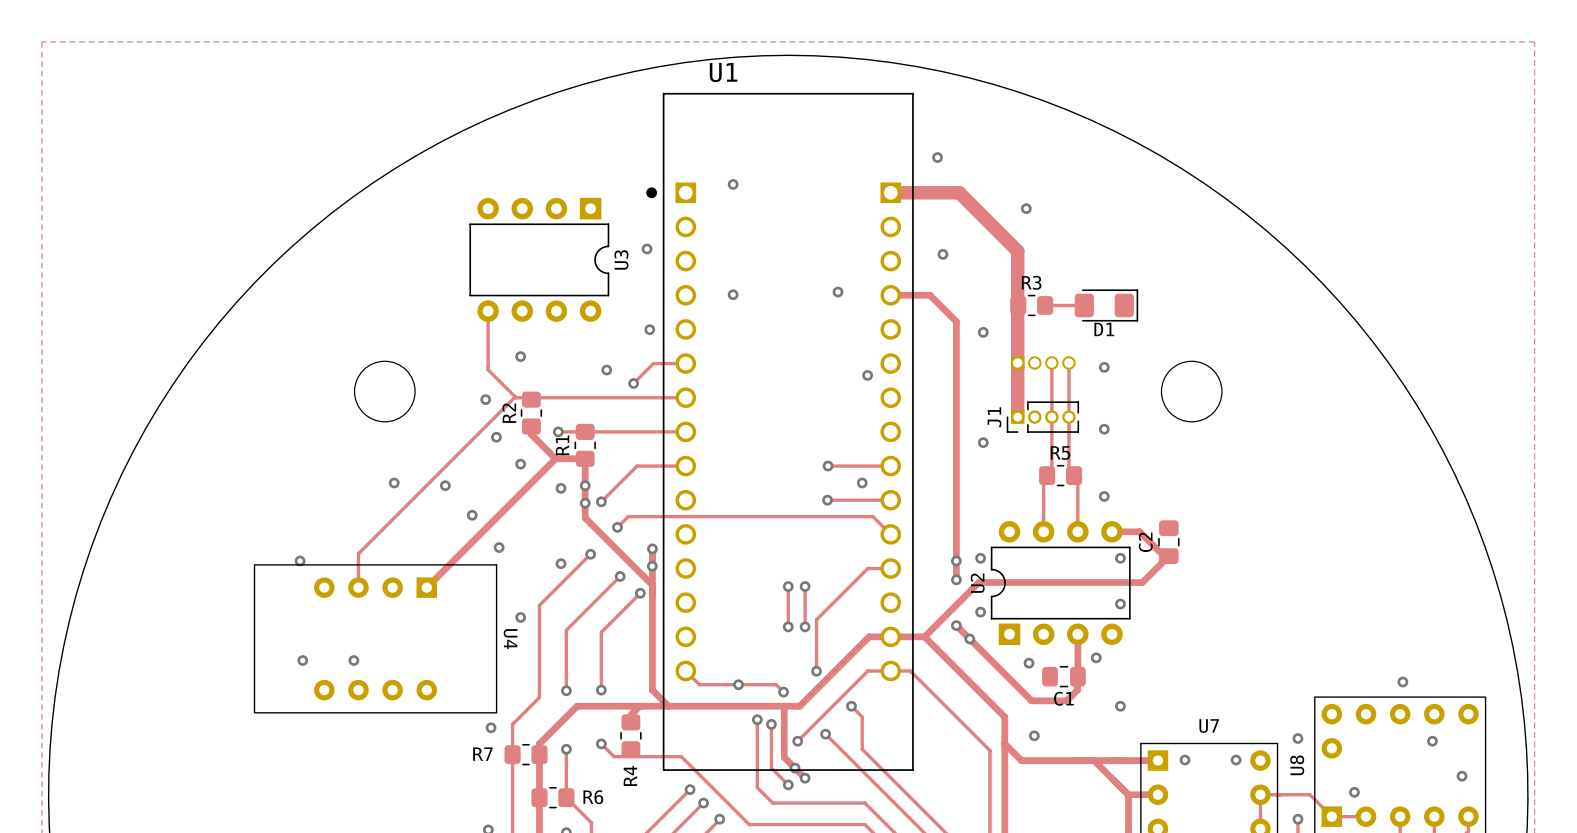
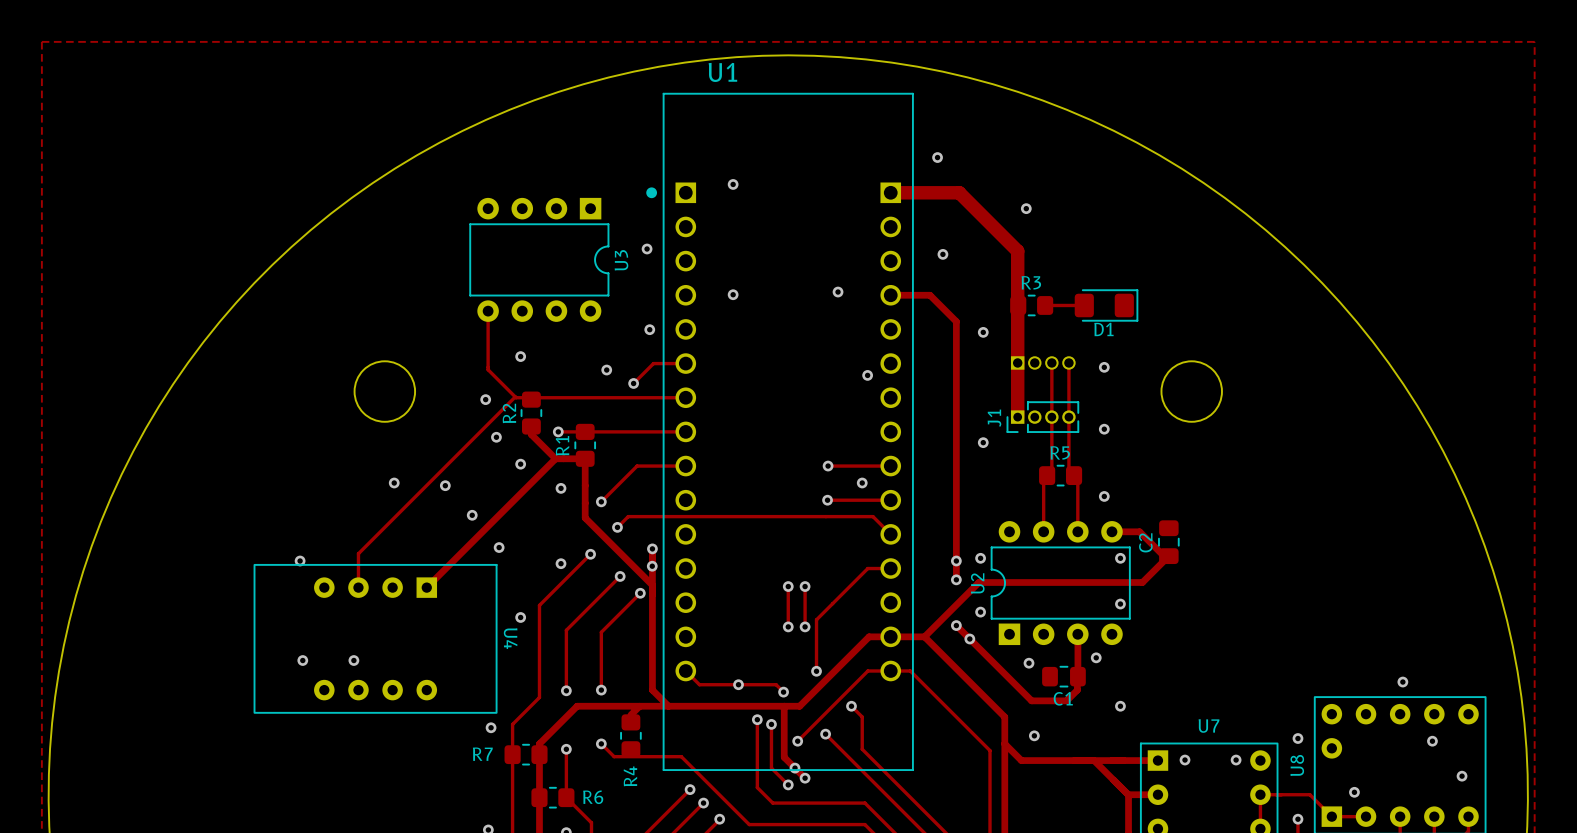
via: (585, 485) -> none
via: (585, 503) -> none

